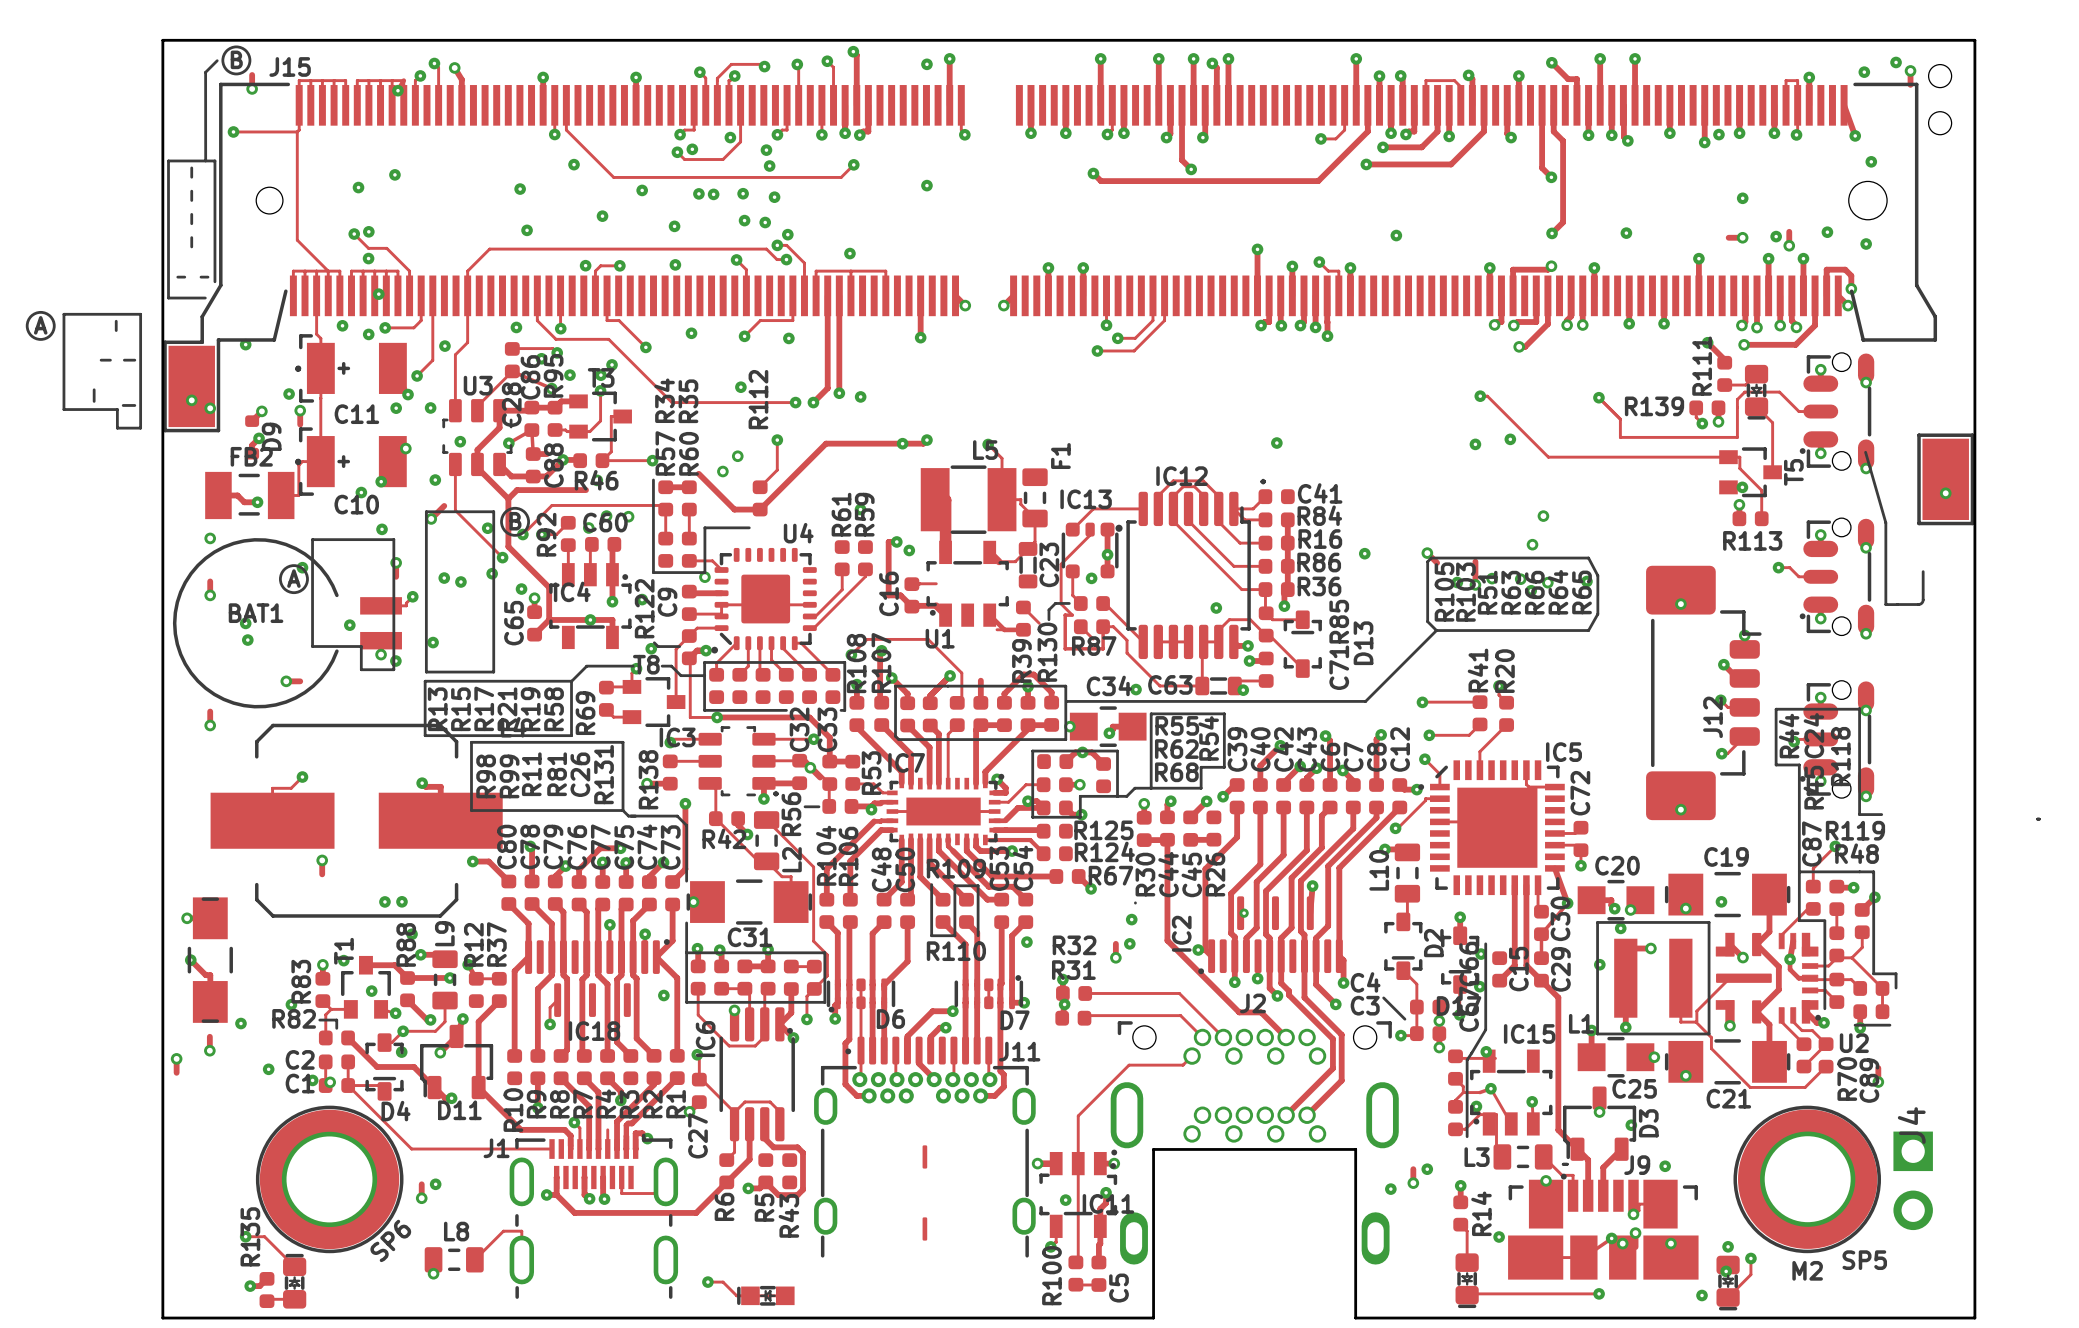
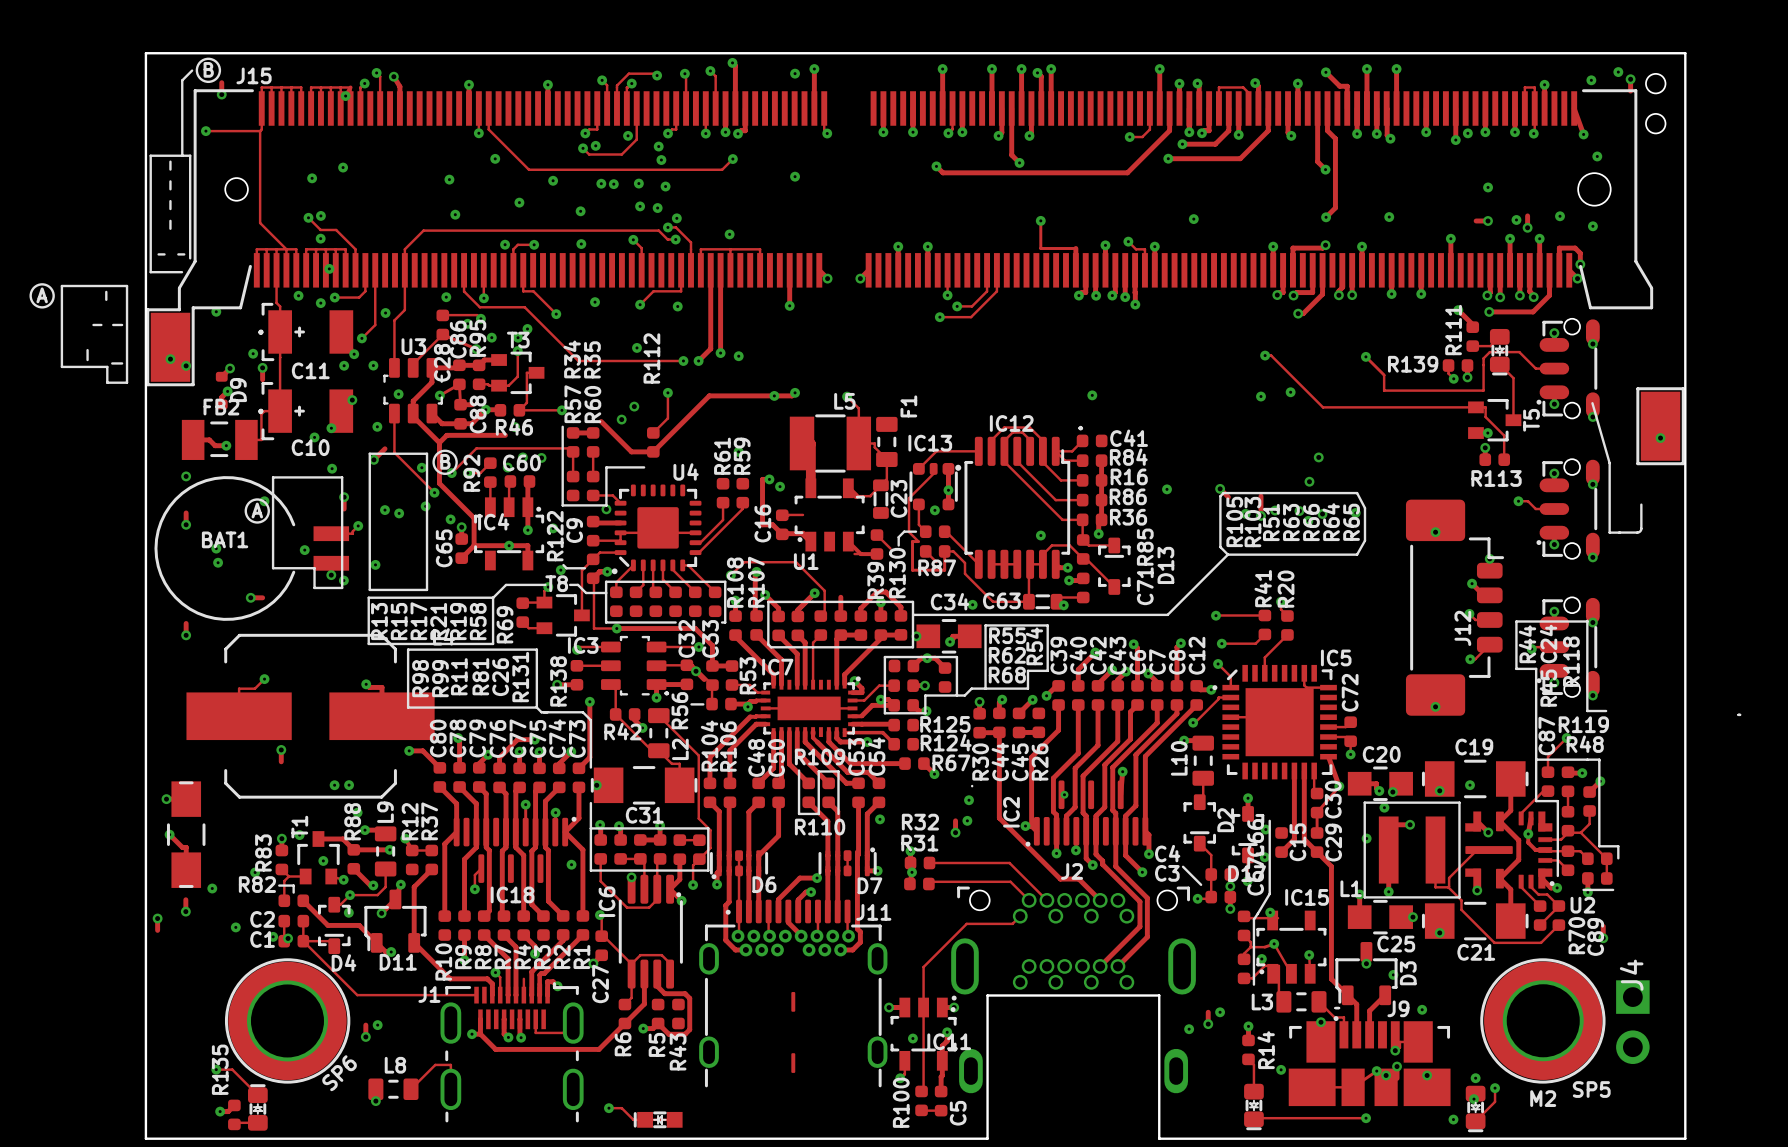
track: (1257, 249) (1257, 270) -> (1040, 220) (1040, 248) (1075, 248)
via position: (1257, 249) -> (1040, 220)

